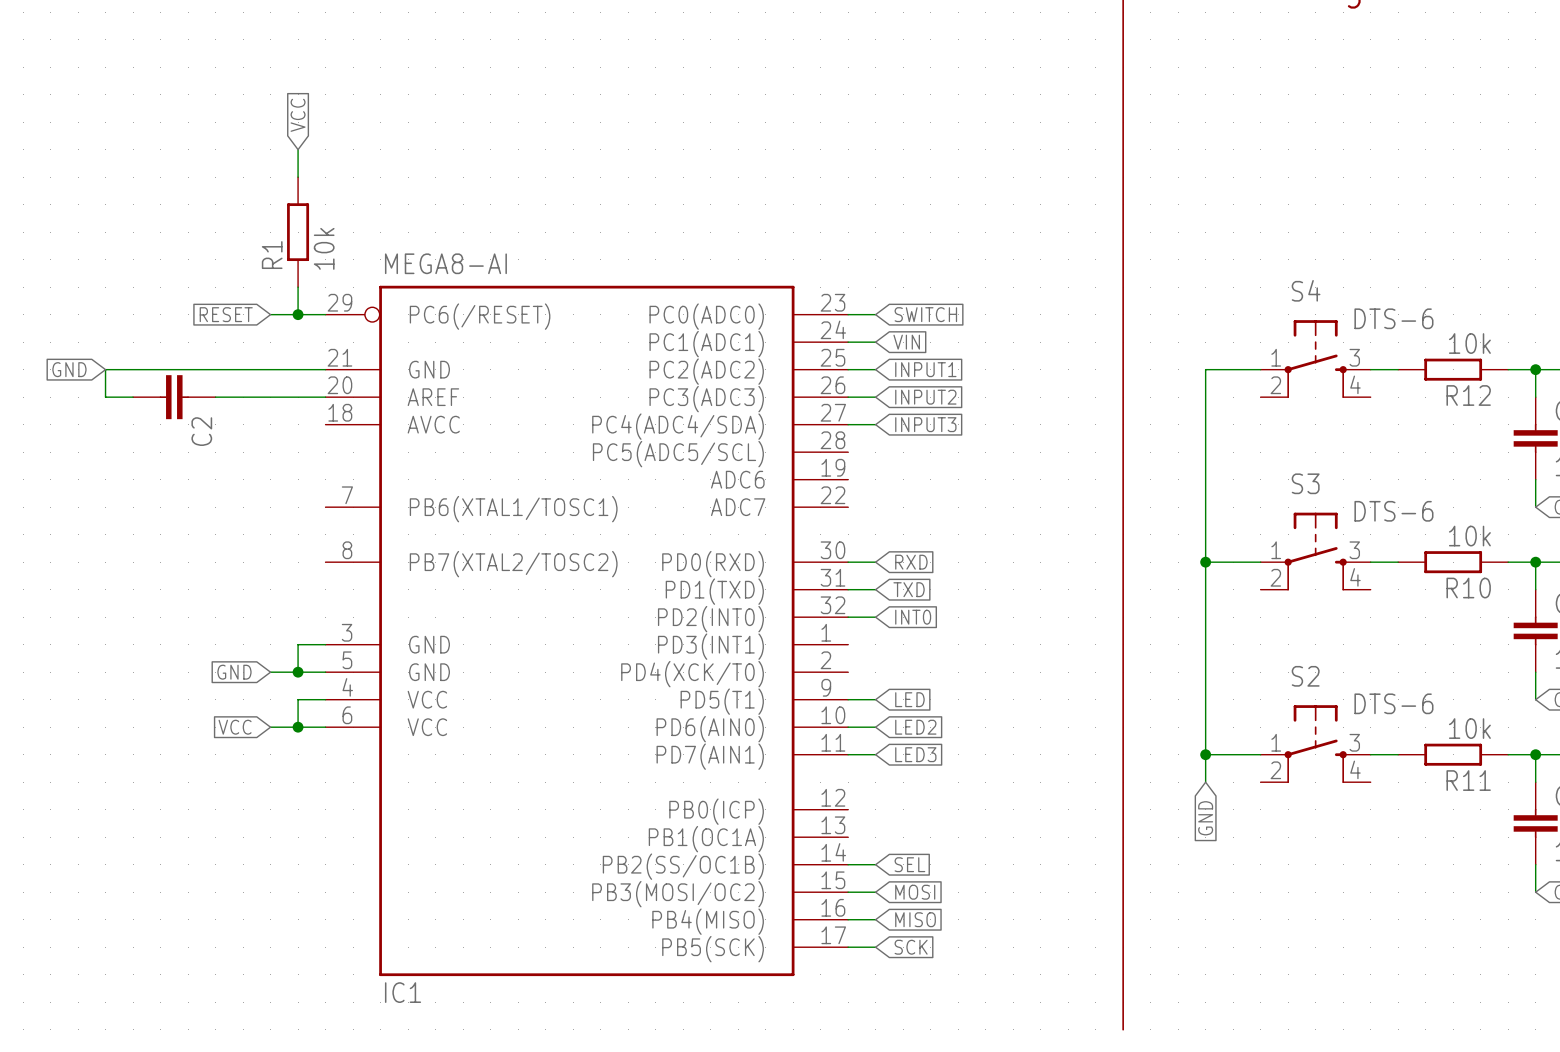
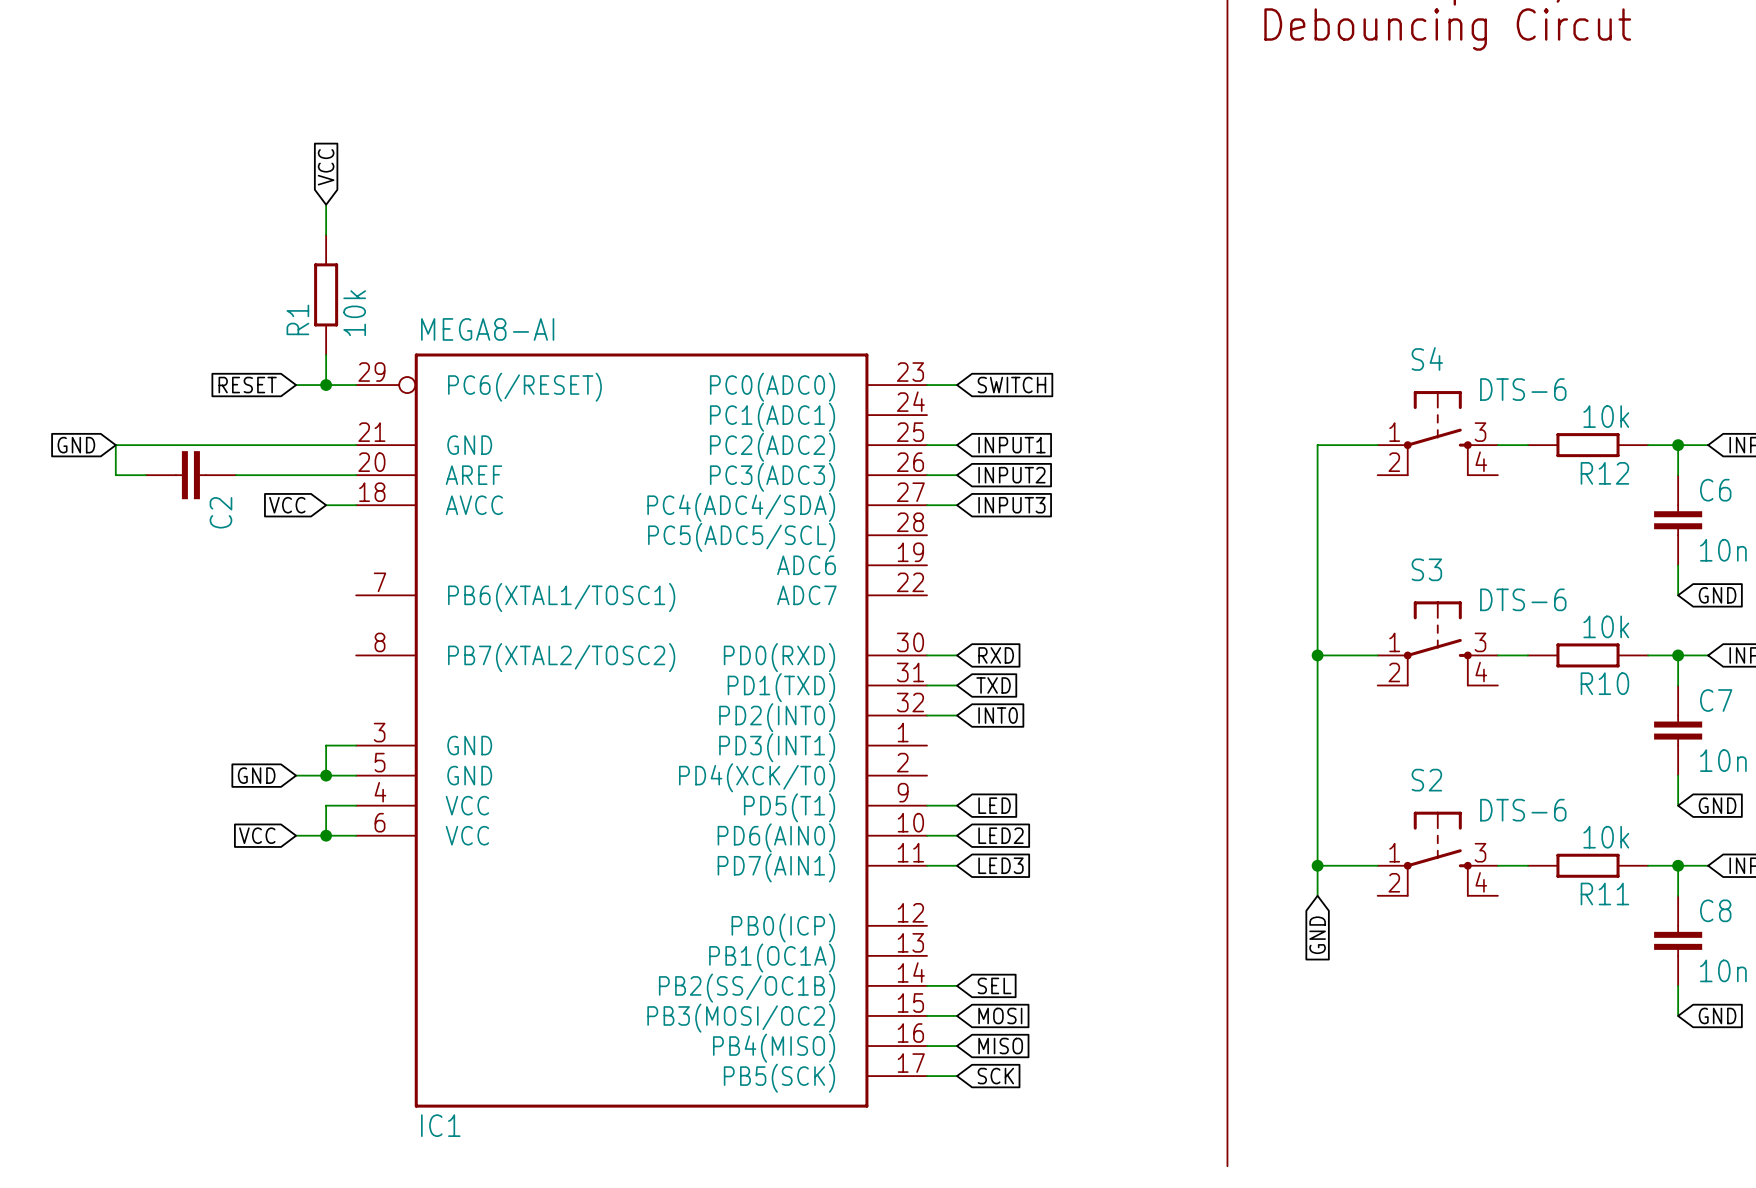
wire: (848, 342) (875, 342) -> none
global label: VIN (906, 342) -> none
global label: none -> VCC (287, 505)
wire: none -> (326, 505) (356, 505)

